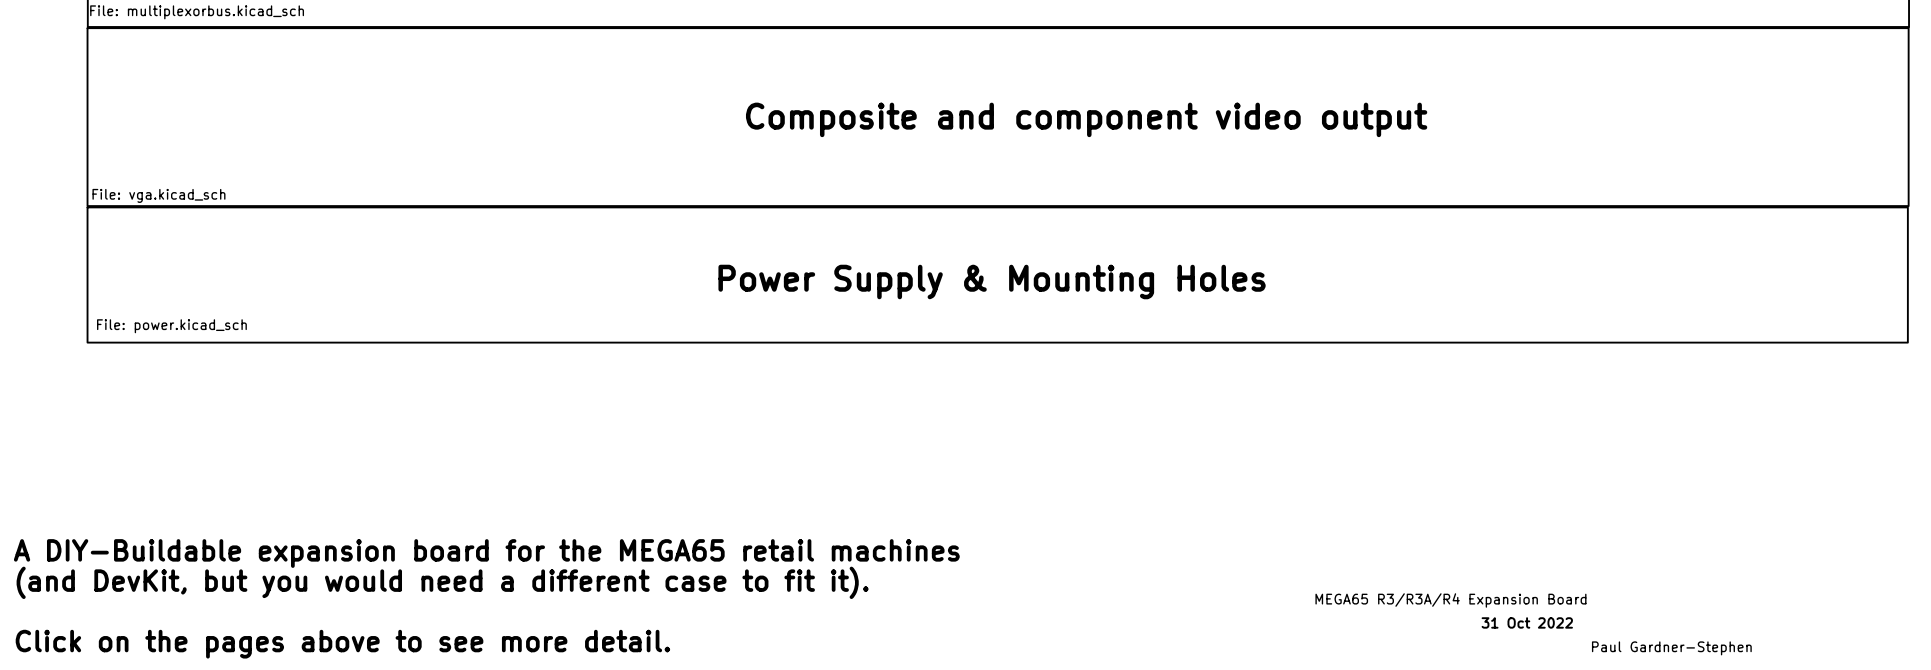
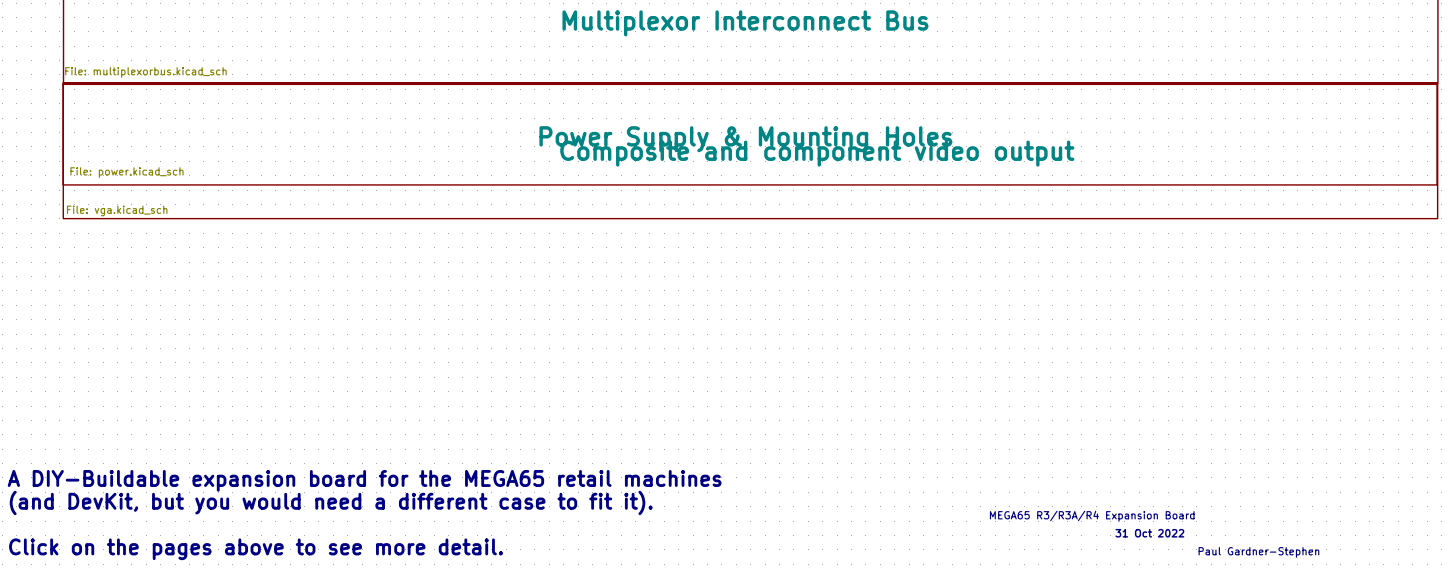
sheet Power Supply & Mounting Holes position: (997, 275) -> (750, 133)

